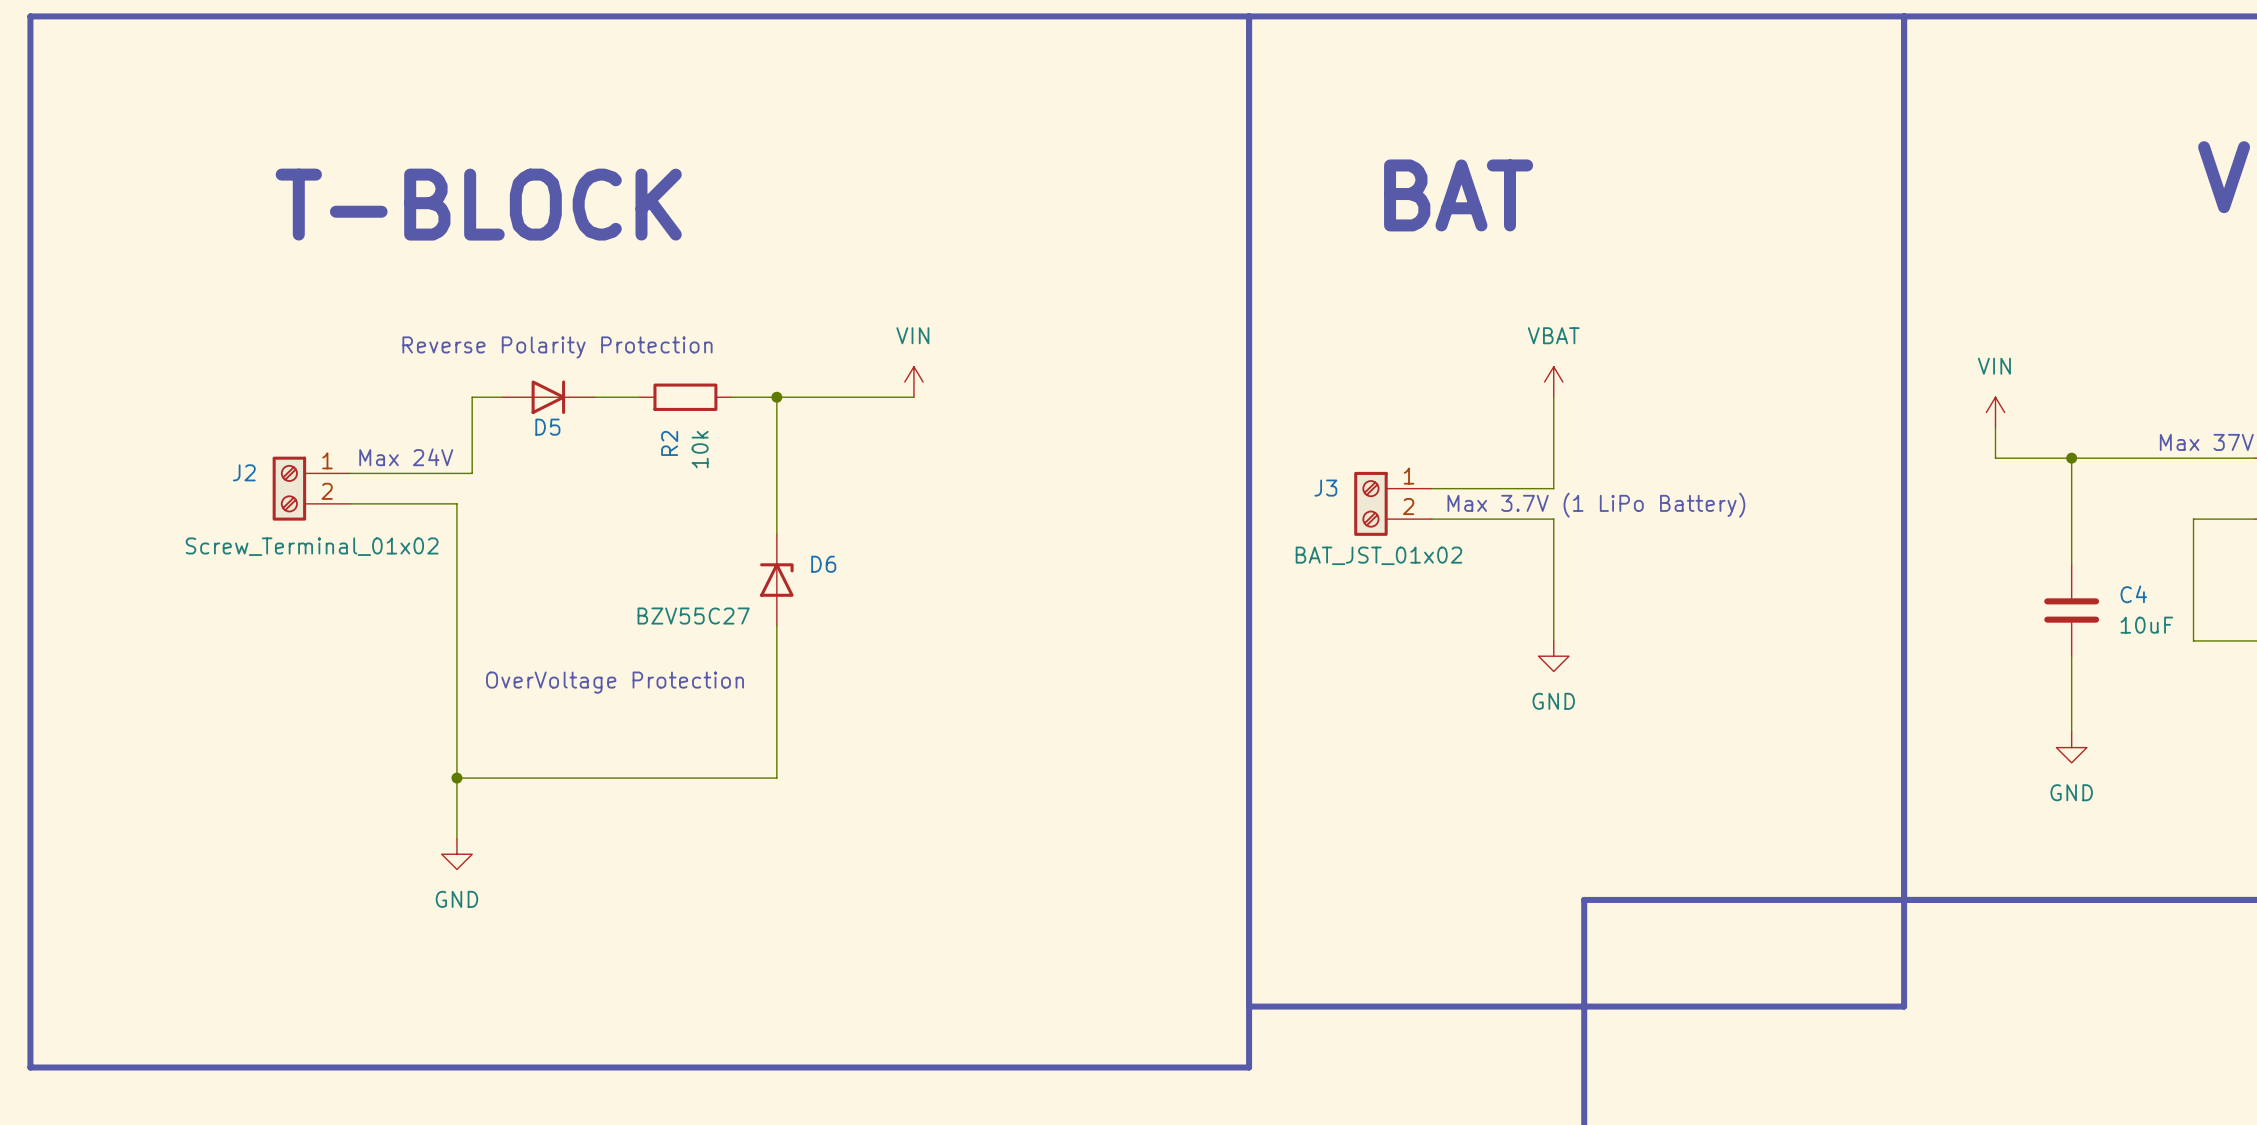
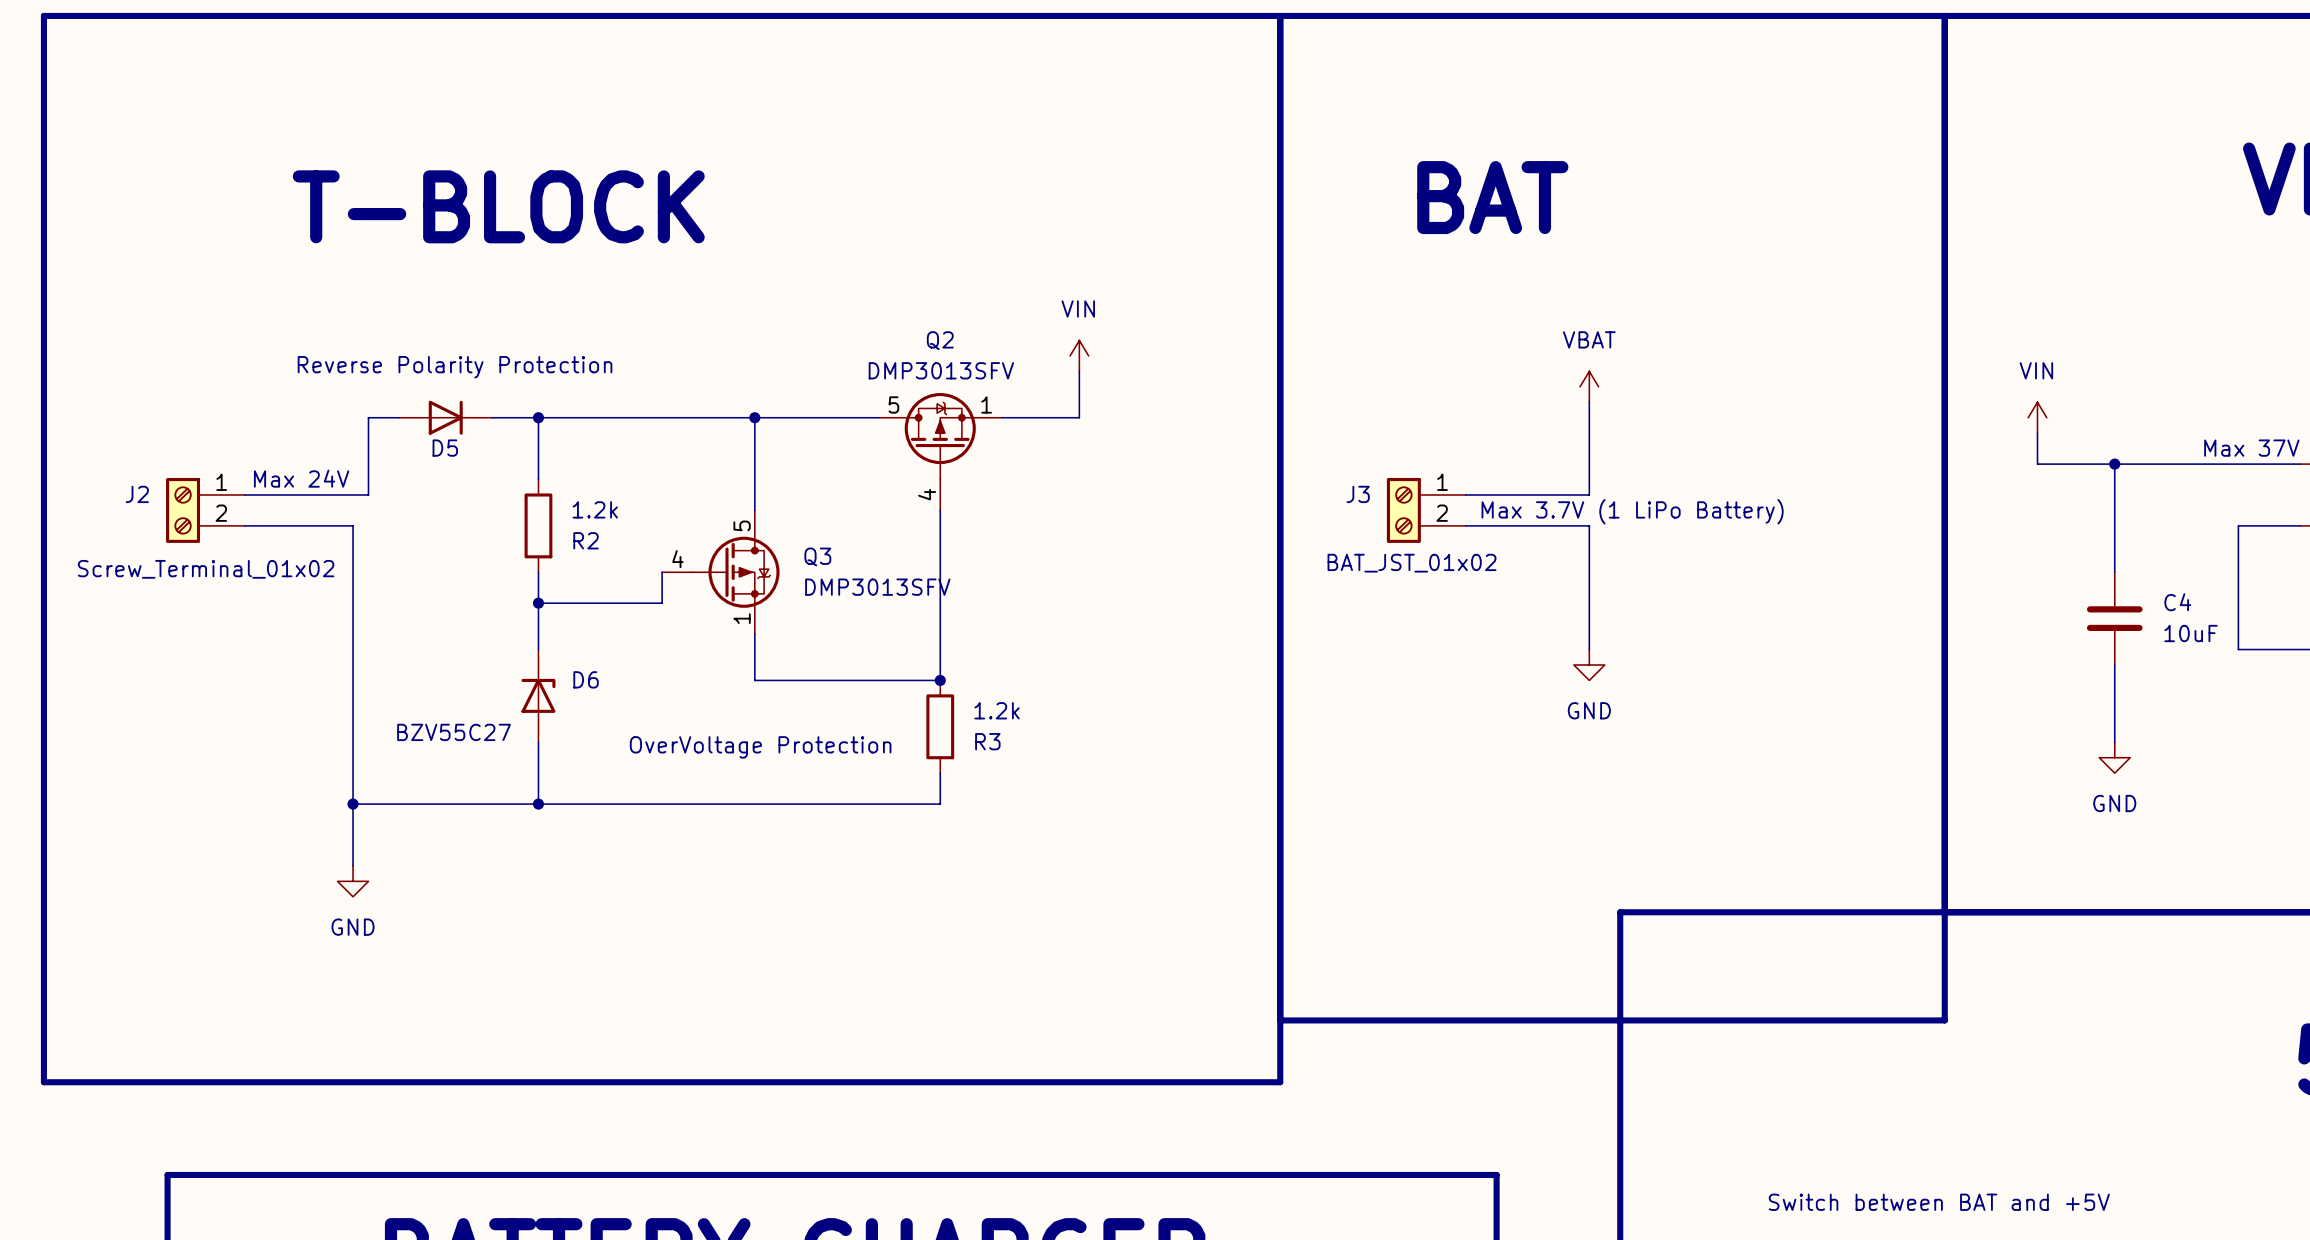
text position: Reverse Polarity Protection (557, 347) -> Reverse Polarity Protection (455, 367)
wire: none -> (1079, 371) (1079, 417) (1002, 417)
power symbol position: VIN (913, 382) -> VIN (1079, 355)
wire: (502, 397) (472, 397) (472, 473) (350, 473) -> (399, 417) (368, 417) (368, 495) (244, 495)
D5 position: (548, 397) -> (445, 417)
wire: (594, 397) (639, 397) -> none
R2 rotation: 0° (685, 397) -> 90° clockwise (538, 525)
R2 position: (685, 397) -> (538, 525)
wire: (731, 397) (913, 397) -> none
wire: (776, 397) (776, 534) -> none
junction position: (776, 397) -> (754, 417)
wire: none -> (492, 417) (878, 417)
wire: none -> (538, 417) (538, 479)
junction: none -> (538, 417)
wire: none -> (754, 417) (754, 510)
R2 name position: R2 (669, 443) -> R2 (586, 540)
Q2: none -> DMP3013SFV (940, 451)
R2 value: 10k (700, 449) -> 1.2k (595, 509)
text position: Max 24V (406, 457) -> Max 24V (301, 478)
J2 position: (311, 488) -> (205, 510)
wire: (350, 503) (456, 503) (456, 839) -> (244, 525) (353, 525) (353, 865)
wire: none -> (940, 510) (940, 680) (754, 680) (754, 634)
wire: none -> (538, 572) (538, 649)
wire: none -> (662, 572) (662, 603) (538, 603)
Q3: none -> DMP3013SFV (720, 572)
D6 position: (776, 580) -> (538, 695)
junction: none -> (538, 603)
wire: (776, 625) (776, 778) (456, 778) -> none
junction: none -> (940, 680)
text position: OverVoltage Protection (615, 682) -> OverVoltage Protection (760, 747)
R3: none -> 1.2k (940, 726)
wire: none -> (538, 742) (538, 804)
wire: none -> (940, 773) (940, 804) (353, 804)
junction: (456, 778) -> none
junction: none -> (353, 804)
junction: none -> (538, 804)
power symbol position: GND (456, 854) -> GND (353, 881)

